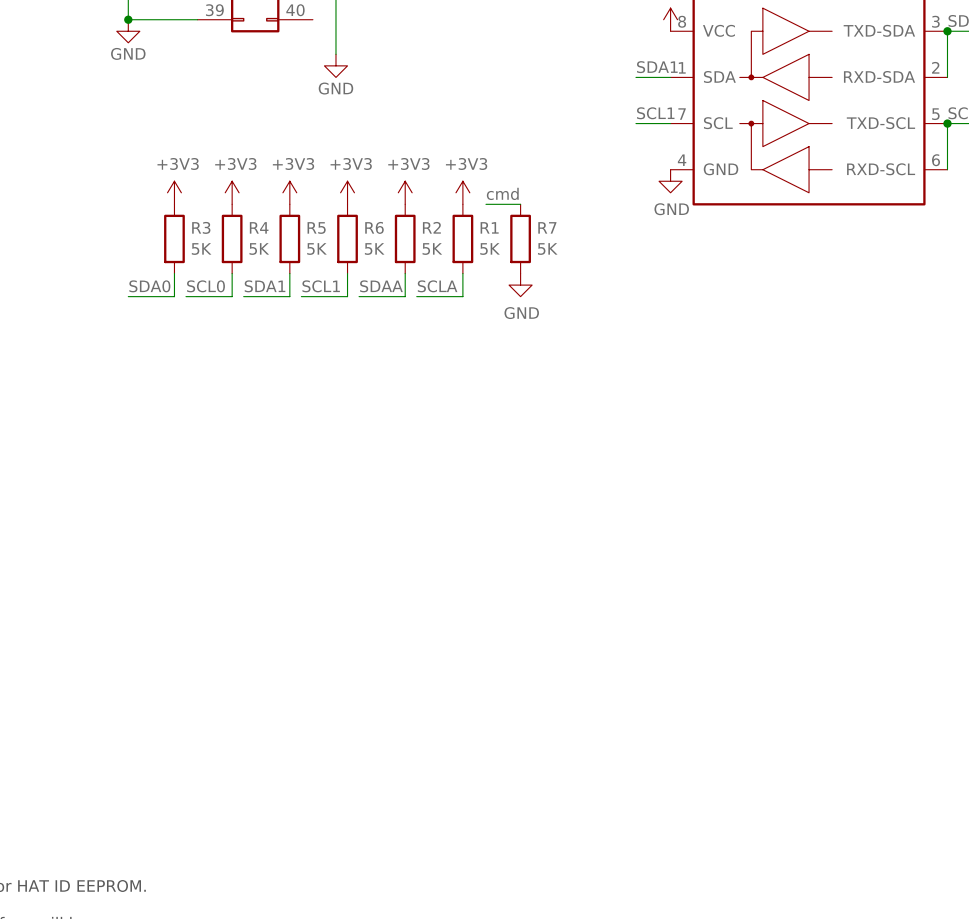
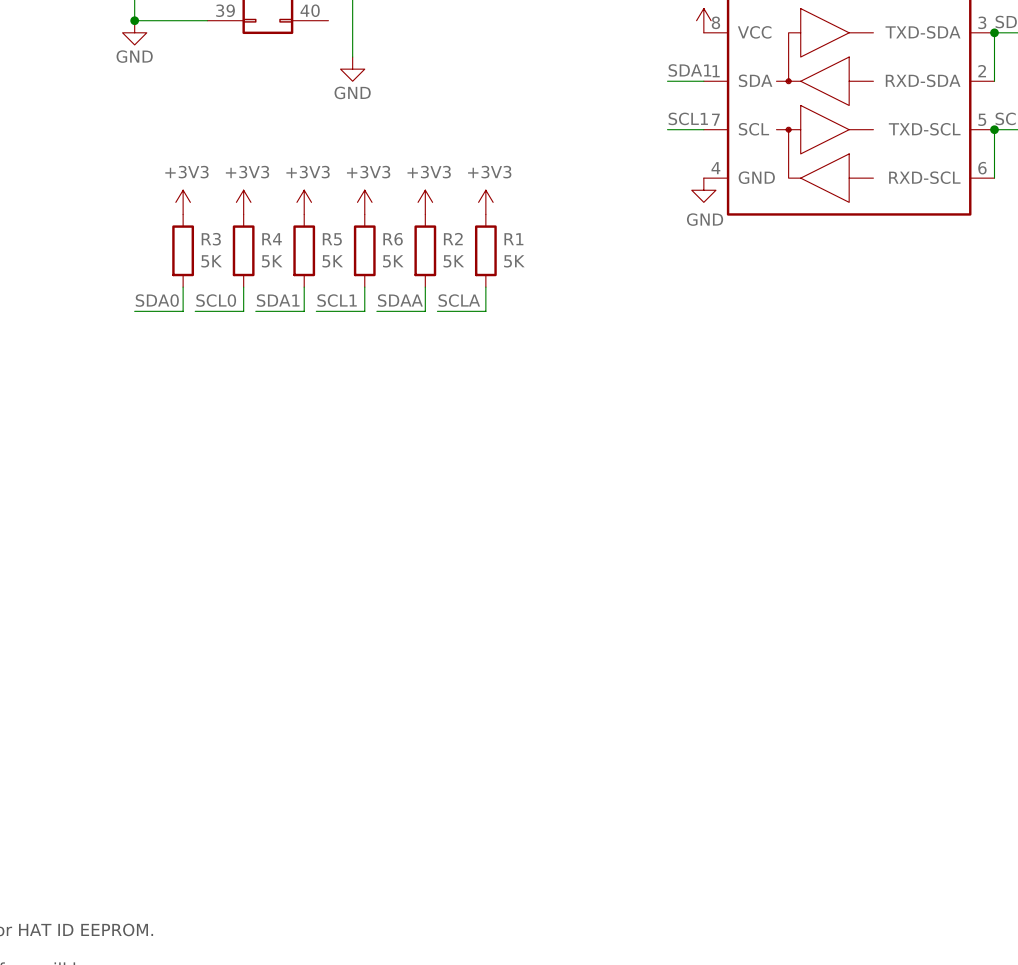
label: cmd (502, 193) -> none
wire: (485, 204) (520, 204) -> none
R7: 5K (520, 238) -> none
power symbol: GND (520, 285) -> none

